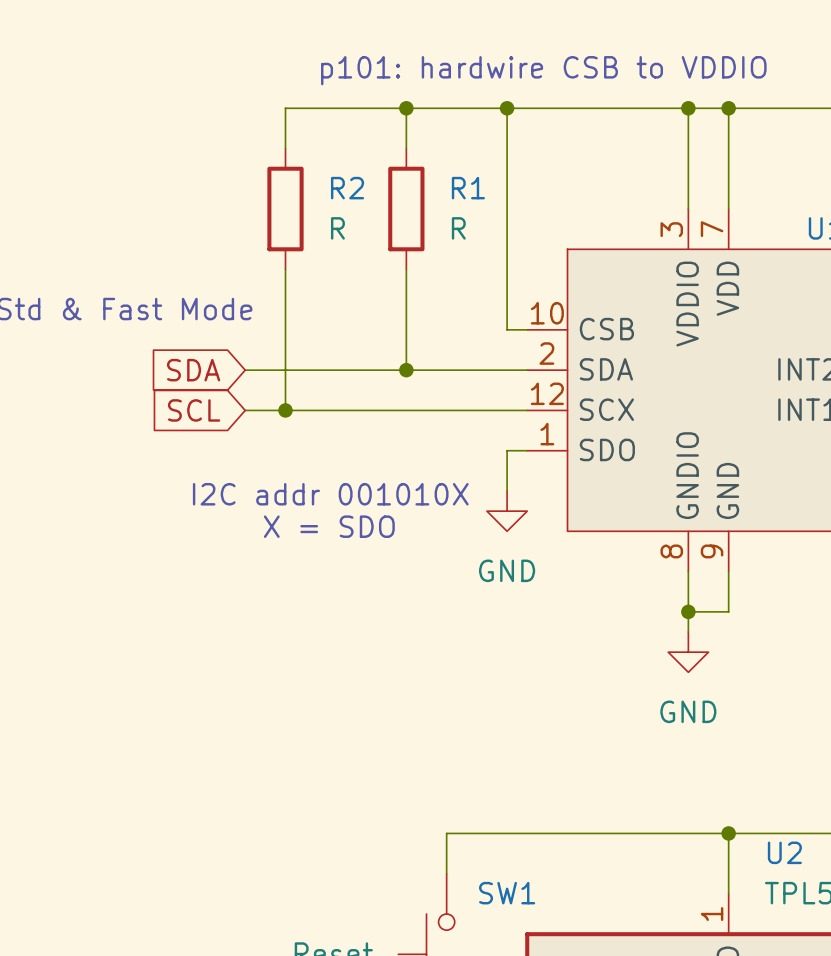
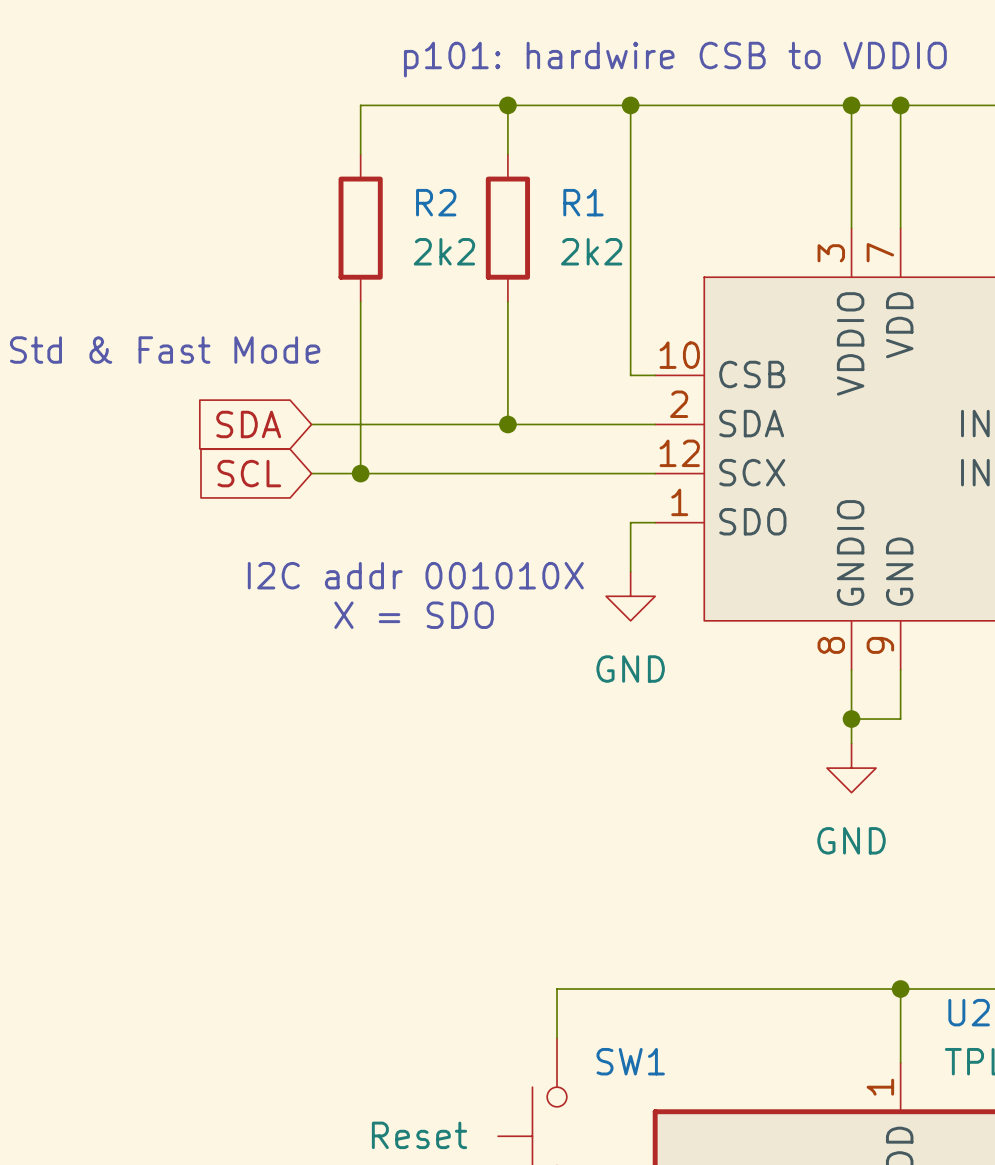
R2 value: R (337, 228) -> 2k2 (444, 251)
R1 value: R (458, 228) -> 2k2 (591, 251)

